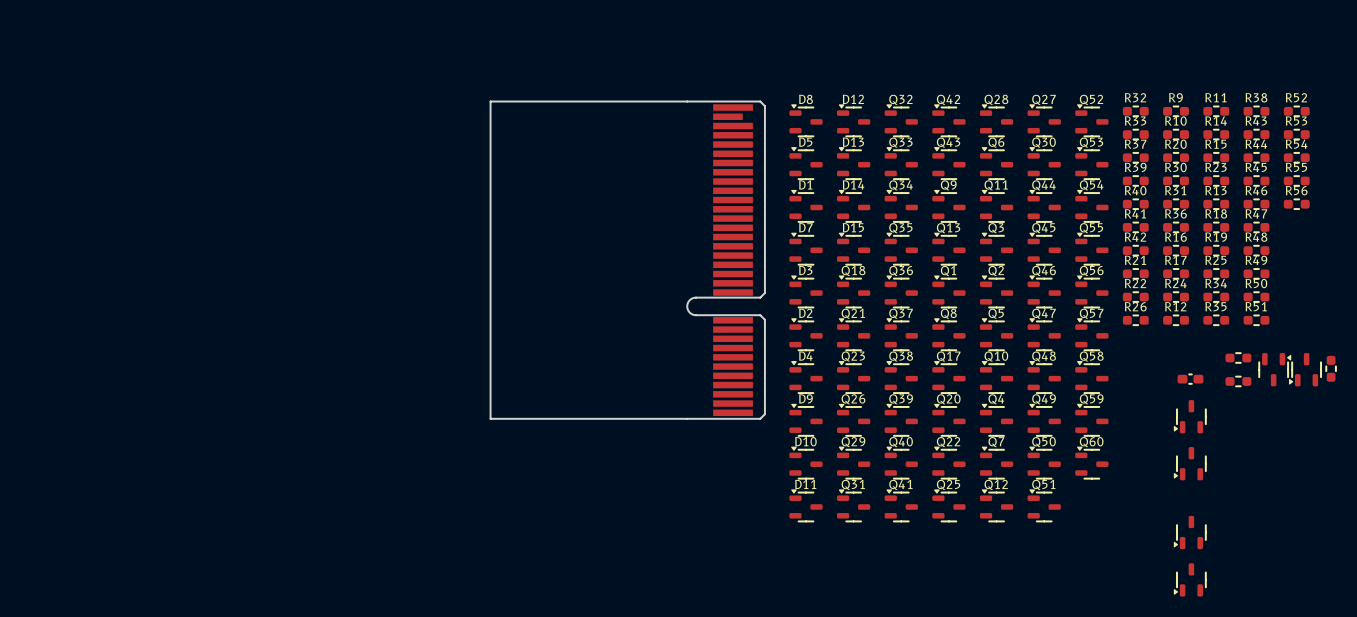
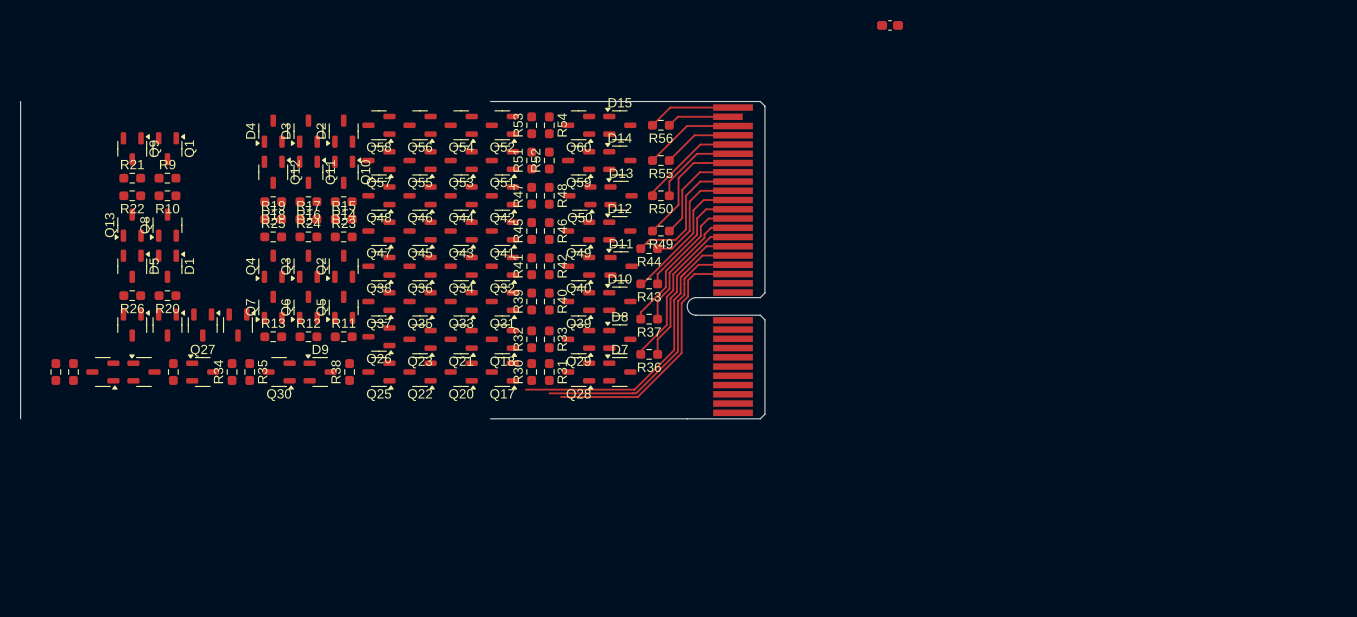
part: none -> (890, 25)
R32 name position: R32 (1135, 97) -> R32 (518, 339)
R38 name position: R38 (1256, 97) -> R38 (336, 371)
R52 name position: R52 (1296, 97) -> R52 (535, 160)
board edge: none -> (20, 101) (20, 418)
board edge: (490, 101) (490, 418) -> none
track: none -> (733, 107) (670, 107) (652, 125)
R32 rotation: 0° (1135, 111) -> 90° clockwise (531, 339)
R32 position: (1135, 111) -> (531, 339)
R9 position: (1176, 111) -> (167, 178)
R11 position: (1216, 111) -> (343, 336)
R38 rotation: 0° (1256, 111) -> 90° clockwise (349, 372)
R38 position: (1256, 111) -> (349, 372)
R52 rotation: 0° (1296, 111) -> 90° clockwise (549, 160)
R52 position: (1296, 111) -> (549, 160)
track: none -> (727, 116) (677, 116) (669, 125)
D8 position: (805, 120) -> (619, 338)
D12 position: (853, 120) -> (619, 229)
Q32 rotation: 0° (901, 120) -> 180° (502, 267)
Q32 position: (901, 120) -> (502, 267)
Q42 rotation: 0° (948, 120) -> 180° (502, 197)
Q42 position: (948, 120) -> (502, 197)
Q28 rotation: 0° (996, 120) -> 180° (578, 373)
Q28 position: (996, 120) -> (578, 373)
Q27 position: (1044, 120) -> (202, 370)
Q52 rotation: 0° (1091, 120) -> 180° (502, 126)
Q52 position: (1091, 120) -> (502, 126)
R14 name position: R14 (1216, 120) -> R14 (344, 214)
R43 name position: R43 (1256, 120) -> R43 (649, 296)
R53 name position: R53 (1296, 120) -> R53 (518, 125)
R10 name position: R10 (1175, 121) -> R10 (167, 208)
track: none -> (733, 126) (686, 126) (652, 160)
R33 rotation: 0° (1135, 134) -> 90° clockwise (549, 339)
R33 position: (1135, 134) -> (549, 339)
R10 position: (1176, 134) -> (167, 195)
R14 position: (1216, 134) -> (343, 201)
R43 position: (1256, 134) -> (649, 283)
R53 rotation: 0° (1296, 134) -> 90° clockwise (531, 125)
R53 position: (1296, 134) -> (531, 125)
track: none -> (733, 135) (694, 135) (669, 160)
track: none -> (733, 144) (700, 144) (652, 192) (652, 195)
R37 name position: R37 (1135, 144) -> R37 (649, 332)
R20 name position: R20 (1175, 144) -> R20 (167, 308)
R44 name position: R44 (1256, 144) -> R44 (649, 261)
track: none -> (733, 153) (697, 153) (669, 181) (669, 195)
R37 position: (1135, 157) -> (649, 319)
R20 position: (1176, 157) -> (167, 295)
R15 position: (1216, 157) -> (343, 219)
R44 position: (1256, 157) -> (649, 248)
R54 rotation: 0° (1296, 157) -> 90° clockwise (549, 125)
R54 position: (1296, 157) -> (549, 125)
track: none -> (733, 163) (693, 163) (678, 178) (678, 204) (652, 231)
D5 rotation: 0° (805, 163) -> 90° clockwise (133, 266)
D5 position: (805, 163) -> (133, 266)
D13 position: (853, 163) -> (621, 194)
Q33 rotation: 0° (901, 163) -> 180° (461, 302)
Q33 position: (901, 163) -> (461, 302)
Q43 rotation: 0° (948, 163) -> 180° (461, 232)
Q43 position: (948, 163) -> (461, 232)
Q6 rotation: 0° (996, 163) -> 90° counterclockwise (307, 307)
Q6 position: (996, 163) -> (307, 307)
Q30 rotation: 0° (1044, 163) -> 180° (279, 373)
Q30 position: (1044, 163) -> (279, 373)
Q53 rotation: 0° (1091, 163) -> 180° (461, 161)
Q53 position: (1091, 163) -> (461, 161)
R39 name position: R39 (1135, 167) -> R39 (518, 301)
R30 name position: R30 (1175, 167) -> R30 (518, 371)
R45 name position: R45 (1256, 167) -> R45 (518, 230)
R55 name position: R55 (1296, 167) -> R55 (661, 173)
track: none -> (733, 172) (699, 172) (682, 189) (682, 218) (669, 231)
R39 rotation: 0° (1135, 180) -> 90° clockwise (531, 301)
R39 position: (1135, 180) -> (531, 301)
R30 rotation: 0° (1176, 180) -> 90° clockwise (531, 372)
R30 position: (1176, 180) -> (531, 372)
R23 position: (1216, 180) -> (343, 236)
R45 rotation: 0° (1256, 180) -> 90° clockwise (531, 231)
R45 position: (1256, 180) -> (531, 231)
R55 position: (1296, 180) -> (660, 160)
track: none -> (733, 181) (700, 181) (685, 195) (685, 229) (675, 239) (649, 239) (640, 248)
track: none -> (733, 190) (700, 190) (689, 201) (689, 231) (672, 248) (657, 248)
R56 name position: R56 (1296, 190) -> R56 (661, 138)
track: none -> (733, 200) (703, 200) (693, 210) (693, 233) (640, 283)
R40 rotation: 0° (1135, 204) -> 90° clockwise (549, 301)
R40 position: (1135, 204) -> (549, 301)
R31 rotation: 0° (1176, 204) -> 90° clockwise (549, 372)
R31 position: (1176, 204) -> (549, 372)
R13 position: (1216, 204) -> (273, 336)
R46 rotation: 0° (1256, 204) -> 90° clockwise (549, 231)
R46 position: (1256, 204) -> (549, 231)
R56 position: (1296, 204) -> (660, 125)
D1 rotation: 0° (805, 206) -> 90° clockwise (168, 266)
D1 position: (805, 206) -> (168, 266)
D14 position: (853, 206) -> (619, 159)
Q34 rotation: 0° (901, 206) -> 180° (461, 267)
Q34 position: (901, 206) -> (461, 267)
Q9 rotation: 0° (948, 206) -> 90° clockwise (133, 148)
Q9 position: (948, 206) -> (133, 148)
Q11 rotation: 0° (996, 206) -> 90° clockwise (309, 172)
Q11 position: (996, 206) -> (309, 172)
Q44 rotation: 0° (1044, 206) -> 180° (461, 197)
Q44 position: (1044, 206) -> (461, 197)
Q54 rotation: 0° (1091, 206) -> 180° (461, 126)
Q54 position: (1091, 206) -> (461, 126)
track: none -> (733, 209) (706, 209) (697, 218) (697, 234) (657, 274) (657, 283)
R41 name position: R41 (1135, 213) -> R41 (518, 266)
R36 name position: R36 (1175, 213) -> R36 (649, 367)
R18 name position: R18 (1216, 213) -> R18 (273, 214)
R47 name position: R47 (1256, 213) -> R47 (518, 195)
track: none -> (733, 218) (708, 218) (700, 226) (700, 236) (665, 271) (665, 287) (640, 312) (640, 319)
track: none -> (733, 227) (711, 227) (704, 234) (704, 237) (669, 272) (669, 288) (657, 300) (657, 319)
R41 rotation: 0° (1135, 227) -> 90° clockwise (531, 266)
R41 position: (1135, 227) -> (531, 266)
R36 position: (1176, 227) -> (649, 354)
R18 position: (1216, 227) -> (273, 201)
R47 rotation: 0° (1256, 227) -> 90° clockwise (531, 195)
R47 position: (1256, 227) -> (531, 195)
track: none -> (733, 237) (710, 237) (673, 274) (673, 290) (666, 296) (666, 325) (640, 351) (640, 354)
R16 name position: R16 (1175, 237) -> R16 (308, 214)
track: none -> (733, 246) (706, 246) (676, 275) (676, 291) (670, 298) (670, 326) (657, 339) (657, 354)
D7 position: (805, 248) -> (619, 370)
D15 position: (853, 248) -> (619, 123)
Q35 rotation: 0° (901, 248) -> 180° (420, 302)
Q35 position: (901, 248) -> (420, 302)
Q13 rotation: 0° (948, 248) -> 90° counterclockwise (130, 225)
Q13 position: (948, 248) -> (130, 225)
Q3 rotation: 0° (996, 248) -> 90° counterclockwise (307, 266)
Q3 position: (996, 248) -> (307, 266)
Q45 rotation: 0° (1044, 248) -> 180° (420, 232)
Q45 position: (1044, 248) -> (420, 232)
Q55 rotation: 0° (1091, 248) -> 180° (420, 161)
Q55 position: (1091, 248) -> (420, 161)
R42 rotation: 0° (1135, 250) -> 90° clockwise (549, 266)
R42 position: (1135, 250) -> (549, 266)
R16 position: (1176, 250) -> (308, 201)
R19 position: (1216, 250) -> (273, 219)
R48 rotation: 0° (1256, 250) -> 90° clockwise (549, 195)
R48 position: (1256, 250) -> (549, 195)
track: none -> (733, 255) (702, 255) (680, 277) (680, 293) (674, 299) (674, 350) (634, 389) (525, 389)
R49 name position: R49 (1256, 260) -> R49 (661, 243)
track: none -> (733, 264) (698, 264) (684, 278) (684, 294) (677, 301) (677, 351) (636, 393) (549, 393)
R21 position: (1135, 273) -> (132, 178)
R17 position: (1176, 273) -> (308, 219)
R25 position: (1216, 273) -> (273, 236)
R49 position: (1256, 273) -> (660, 231)
track: none -> (733, 274) (694, 274) (688, 280) (688, 296) (681, 302) (681, 353) (637, 397) (561, 397)
R22 name position: R22 (1135, 283) -> R22 (132, 208)
R34 name position: R34 (1216, 283) -> R34 (218, 371)
R50 name position: R50 (1256, 283) -> R50 (661, 208)
D3 rotation: 0° (805, 291) -> 90° counterclockwise (307, 131)
D3 position: (805, 291) -> (307, 131)
Q18 rotation: 0° (853, 291) -> 180° (502, 340)
Q18 position: (853, 291) -> (502, 340)
Q36 rotation: 0° (901, 291) -> 180° (420, 267)
Q36 position: (901, 291) -> (420, 267)
Q1 rotation: 0° (948, 291) -> 90° clockwise (168, 148)
Q1 position: (948, 291) -> (168, 148)
Q2 rotation: 0° (996, 291) -> 90° counterclockwise (342, 266)
Q2 position: (996, 291) -> (342, 266)
Q46 rotation: 0° (1044, 291) -> 180° (420, 197)
Q46 position: (1044, 291) -> (420, 197)
Q56 rotation: 0° (1091, 291) -> 180° (420, 126)
Q56 position: (1091, 291) -> (420, 126)
R22 position: (1135, 297) -> (132, 195)
R24 position: (1176, 297) -> (308, 236)
R34 rotation: 0° (1216, 297) -> 90° clockwise (232, 372)
R34 position: (1216, 297) -> (232, 372)
R50 position: (1256, 297) -> (660, 195)
R26 name position: R26 (1135, 306) -> R26 (132, 308)
R51 name position: R51 (1256, 306) -> R51 (518, 160)
R26 position: (1135, 320) -> (132, 295)
R12 position: (1176, 320) -> (308, 336)
R35 rotation: 0° (1216, 320) -> 90° clockwise (249, 372)
R35 position: (1216, 320) -> (249, 372)
R51 rotation: 0° (1256, 320) -> 90° clockwise (531, 160)
R51 position: (1256, 320) -> (531, 160)
part: none -> (133, 325)
part: none -> (168, 325)
part: none -> (204, 325)
part: none -> (239, 325)
D2 rotation: 0° (805, 334) -> 90° counterclockwise (342, 131)
D2 position: (805, 334) -> (342, 131)
Q21 rotation: 0° (853, 334) -> 180° (461, 340)
Q21 position: (853, 334) -> (461, 340)
Q37 rotation: 0° (901, 334) -> 180° (378, 302)
Q37 position: (901, 334) -> (378, 302)
Q8 rotation: 0° (948, 334) -> 90° counterclockwise (166, 225)
Q8 position: (948, 334) -> (166, 225)
Q5 rotation: 0° (996, 334) -> 90° counterclockwise (342, 307)
Q5 position: (996, 334) -> (342, 307)
Q47 rotation: 0° (1044, 334) -> 180° (378, 232)
Q47 position: (1044, 334) -> (378, 232)
Q57 rotation: 0° (1091, 334) -> 180° (378, 161)
Q57 position: (1091, 334) -> (378, 161)
part: (1238, 357) -> none
part: (1331, 368) -> none
part: (1274, 369) -> none
part: (1305, 369) -> none
part: none -> (143, 370)
part: none -> (55, 372)
part: none -> (73, 372)
part: none -> (173, 372)
part: none -> (102, 373)
D4 rotation: 0° (805, 377) -> 90° counterclockwise (271, 131)
D4 position: (805, 377) -> (271, 131)
Q23 rotation: 0° (853, 377) -> 180° (420, 340)
Q23 position: (853, 377) -> (420, 340)
Q38 rotation: 0° (901, 377) -> 180° (378, 267)
Q38 position: (901, 377) -> (378, 267)
Q17 rotation: 0° (948, 377) -> 180° (502, 373)
Q17 position: (948, 377) -> (502, 373)
Q10 rotation: 0° (996, 377) -> 90° clockwise (345, 172)
Q10 position: (996, 377) -> (345, 172)
Q48 rotation: 0° (1044, 377) -> 180° (378, 197)
Q48 position: (1044, 377) -> (378, 197)
Q58 rotation: 0° (1091, 377) -> 180° (378, 126)
Q58 position: (1091, 377) -> (378, 126)
part: (1190, 379) -> none
part: (1238, 381) -> none
part: (1190, 416) -> none
D9 position: (805, 420) -> (320, 370)
Q26 rotation: 0° (853, 420) -> 180° (378, 338)
Q26 position: (853, 420) -> (378, 338)
Q39 rotation: 0° (901, 420) -> 180° (578, 302)
Q39 position: (901, 420) -> (578, 302)
Q20 rotation: 0° (948, 420) -> 180° (461, 373)
Q20 position: (948, 420) -> (461, 373)
Q4 rotation: 0° (996, 420) -> 90° counterclockwise (271, 266)
Q4 position: (996, 420) -> (271, 266)
Q49 rotation: 0° (1044, 420) -> 180° (578, 232)
Q49 position: (1044, 420) -> (578, 232)
Q59 rotation: 0° (1091, 420) -> 180° (578, 161)
Q59 position: (1091, 420) -> (578, 161)
D10 position: (805, 462) -> (619, 300)
Q29 rotation: 0° (853, 462) -> 180° (578, 340)
Q29 position: (853, 462) -> (578, 340)
Q40 rotation: 0° (901, 462) -> 180° (578, 267)
Q40 position: (901, 462) -> (578, 267)
Q22 rotation: 0° (948, 462) -> 180° (420, 373)
Q22 position: (948, 462) -> (420, 373)
Q7 rotation: 0° (996, 462) -> 90° counterclockwise (271, 307)
Q7 position: (996, 462) -> (271, 307)
Q50 rotation: 0° (1044, 462) -> 180° (579, 197)
Q50 position: (1044, 462) -> (579, 197)
Q60 rotation: 0° (1091, 462) -> 180° (578, 126)
Q60 position: (1091, 462) -> (578, 126)
part: (1190, 463) -> none
D11 position: (805, 505) -> (621, 264)
Q31 rotation: 0° (853, 505) -> 180° (502, 302)
Q31 position: (853, 505) -> (502, 302)
Q41 rotation: 0° (901, 505) -> 180° (502, 232)
Q41 position: (901, 505) -> (502, 232)
Q25 rotation: 0° (948, 505) -> 180° (378, 373)
Q25 position: (948, 505) -> (378, 373)
Q12 rotation: 0° (996, 505) -> 90° clockwise (274, 172)
Q12 position: (996, 505) -> (274, 172)
Q51 rotation: 0° (1044, 505) -> 180° (502, 161)
Q51 position: (1044, 505) -> (502, 161)
part: (1190, 532) -> none
part: (1190, 579) -> none

